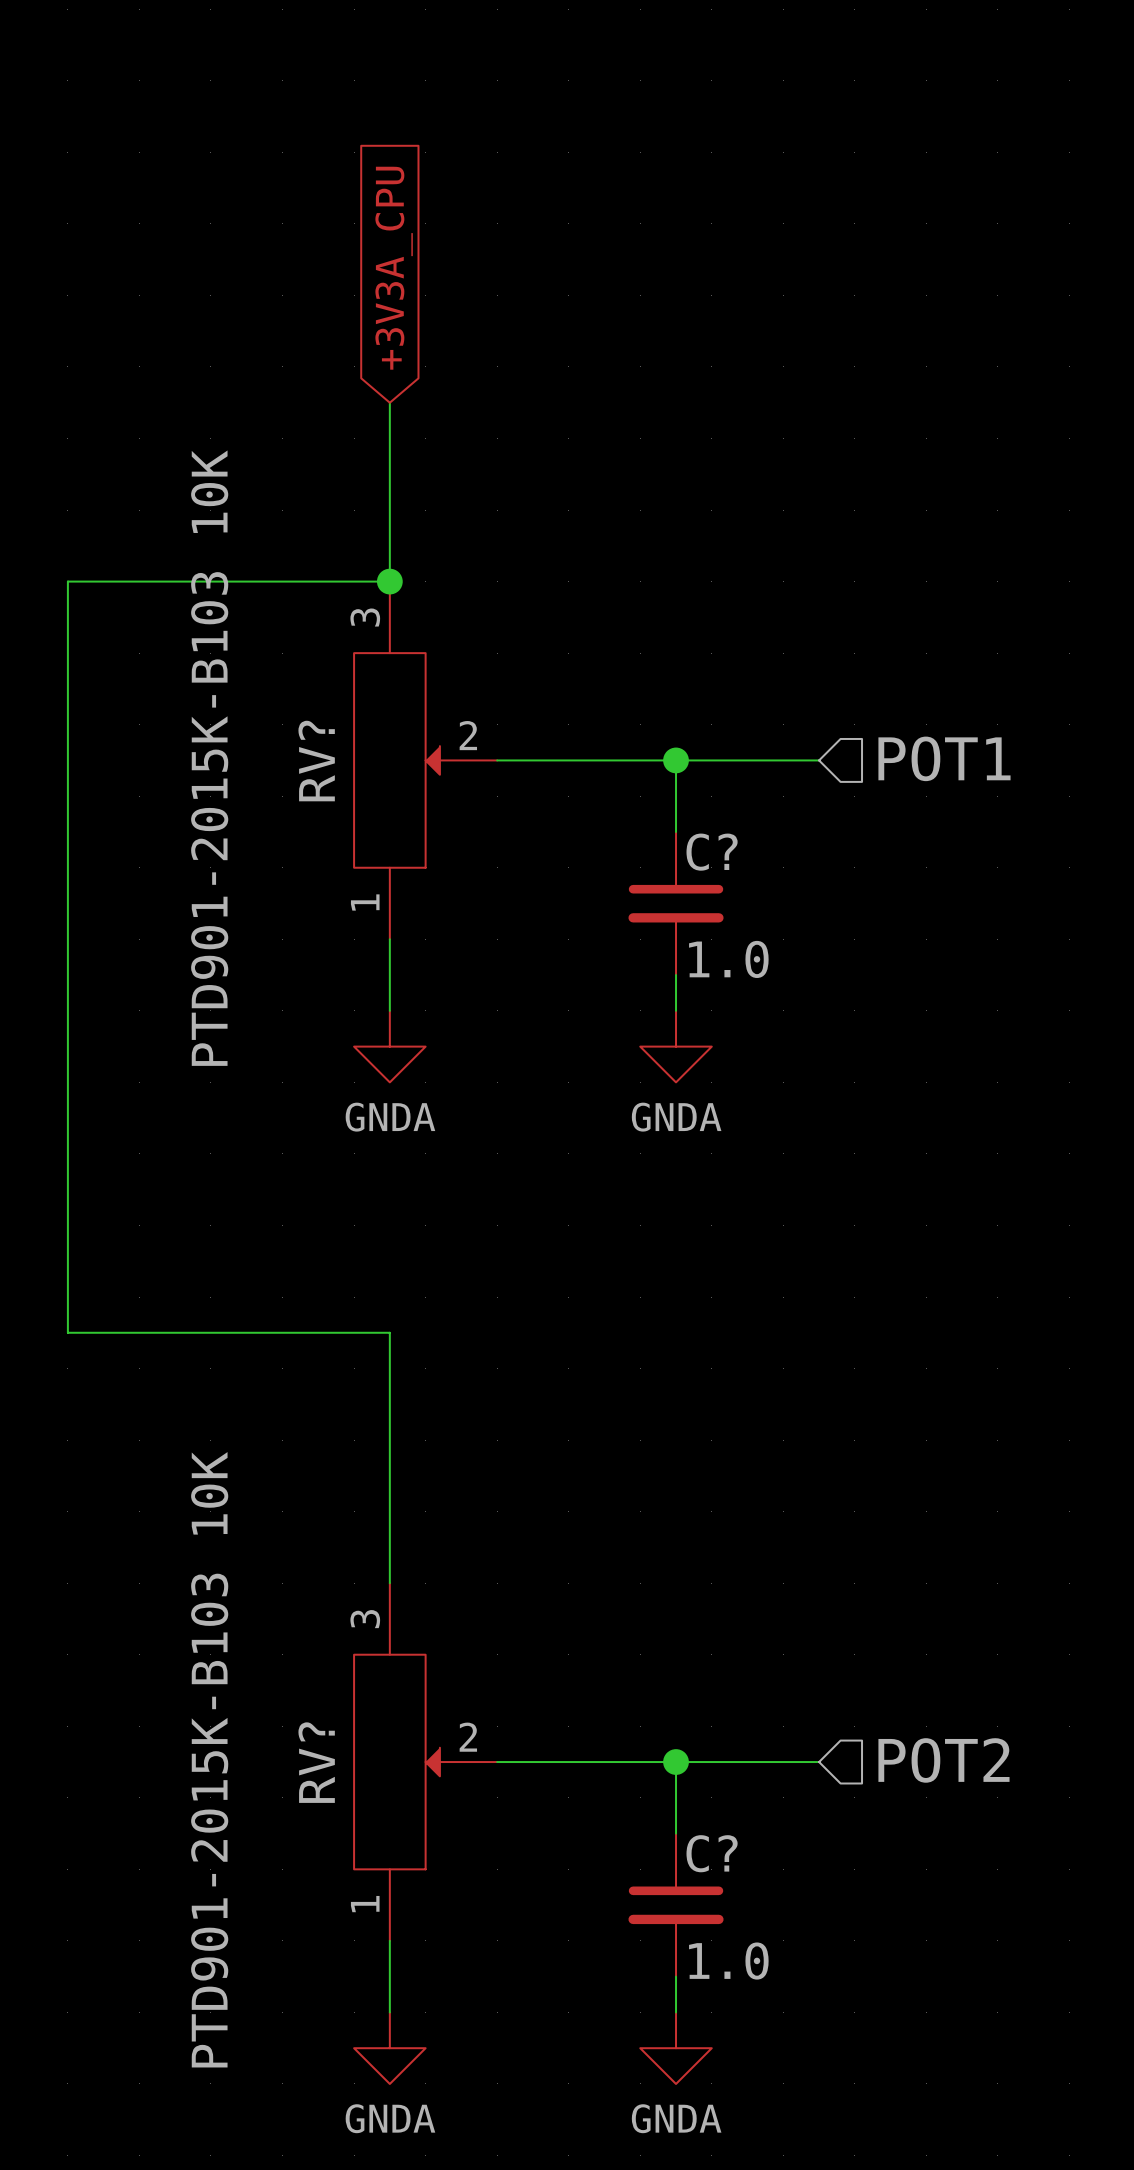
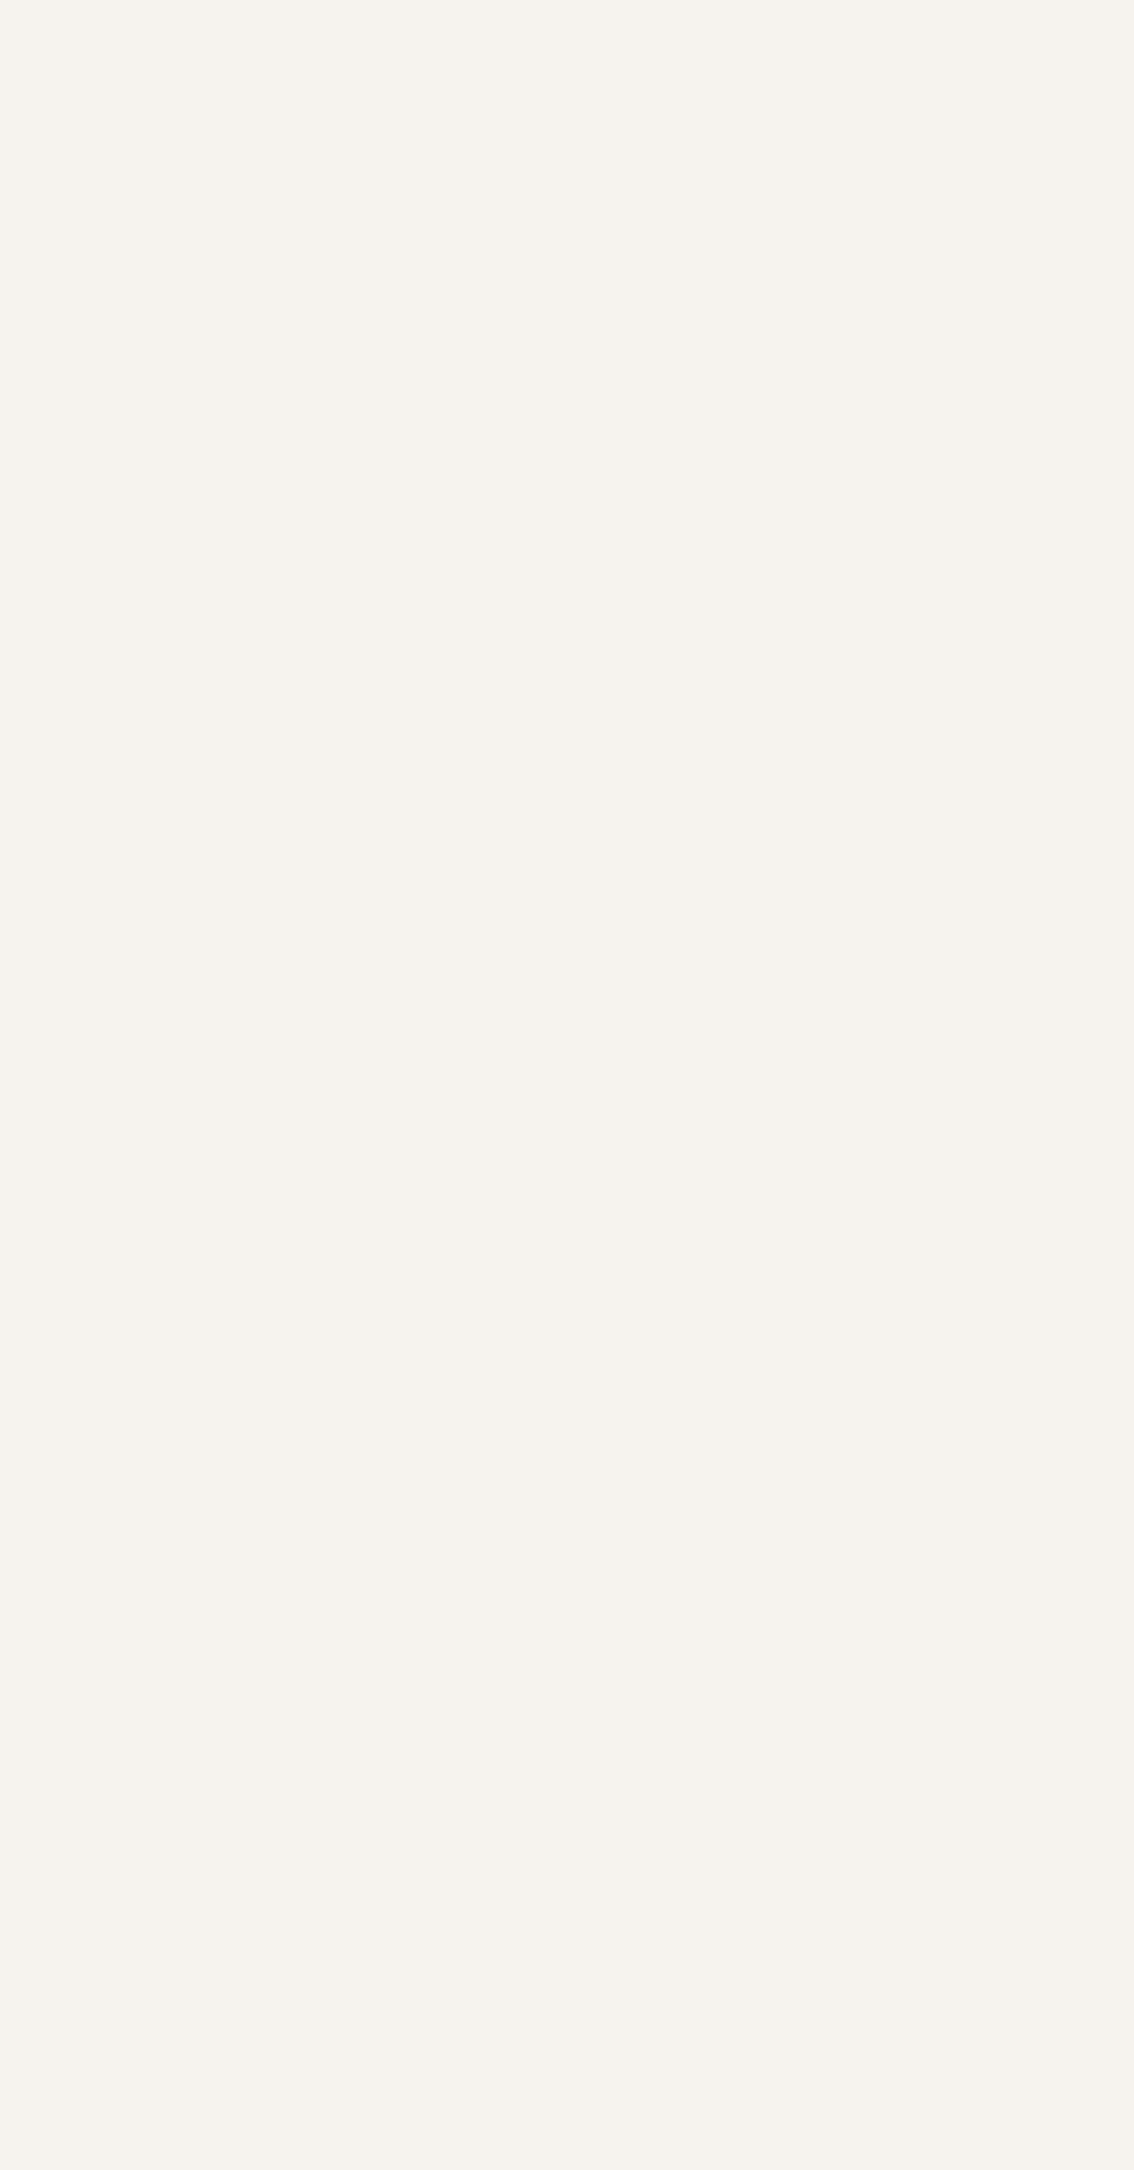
global label: +3V3A_CPU (394, 268) -> none
wire: (389, 402) (389, 581) (67, 581) (67, 1332) (389, 1332) (389, 1583) -> none
junction: (389, 581) -> none
hierarchical label: POT1 (944, 758) -> none
RV?: PTD901-2015K-B103 10K (425, 760) -> none
wire: (497, 760) (819, 760) -> none
wire: (676, 760) (676, 831) -> none
junction: (676, 760) -> none
C?: 1.0 (676, 903) -> none
wire: (389, 939) (389, 1010) -> none
wire: (676, 975) (676, 1010) -> none
power symbol: GNDA (389, 1046) -> none
power symbol: GNDA (676, 1046) -> none
hierarchical label: POT2 (943, 1760) -> none
RV?: PTD901-2015K-B103 10K (425, 1762) -> none
wire: (497, 1762) (819, 1762) -> none
wire: (676, 1762) (676, 1833) -> none
junction: (676, 1762) -> none
C?: 1.0 (676, 1905) -> none
wire: (389, 1940) (389, 2012) -> none
wire: (676, 1976) (676, 2012) -> none
power symbol: GNDA (389, 2048) -> none
power symbol: GNDA (676, 2048) -> none

